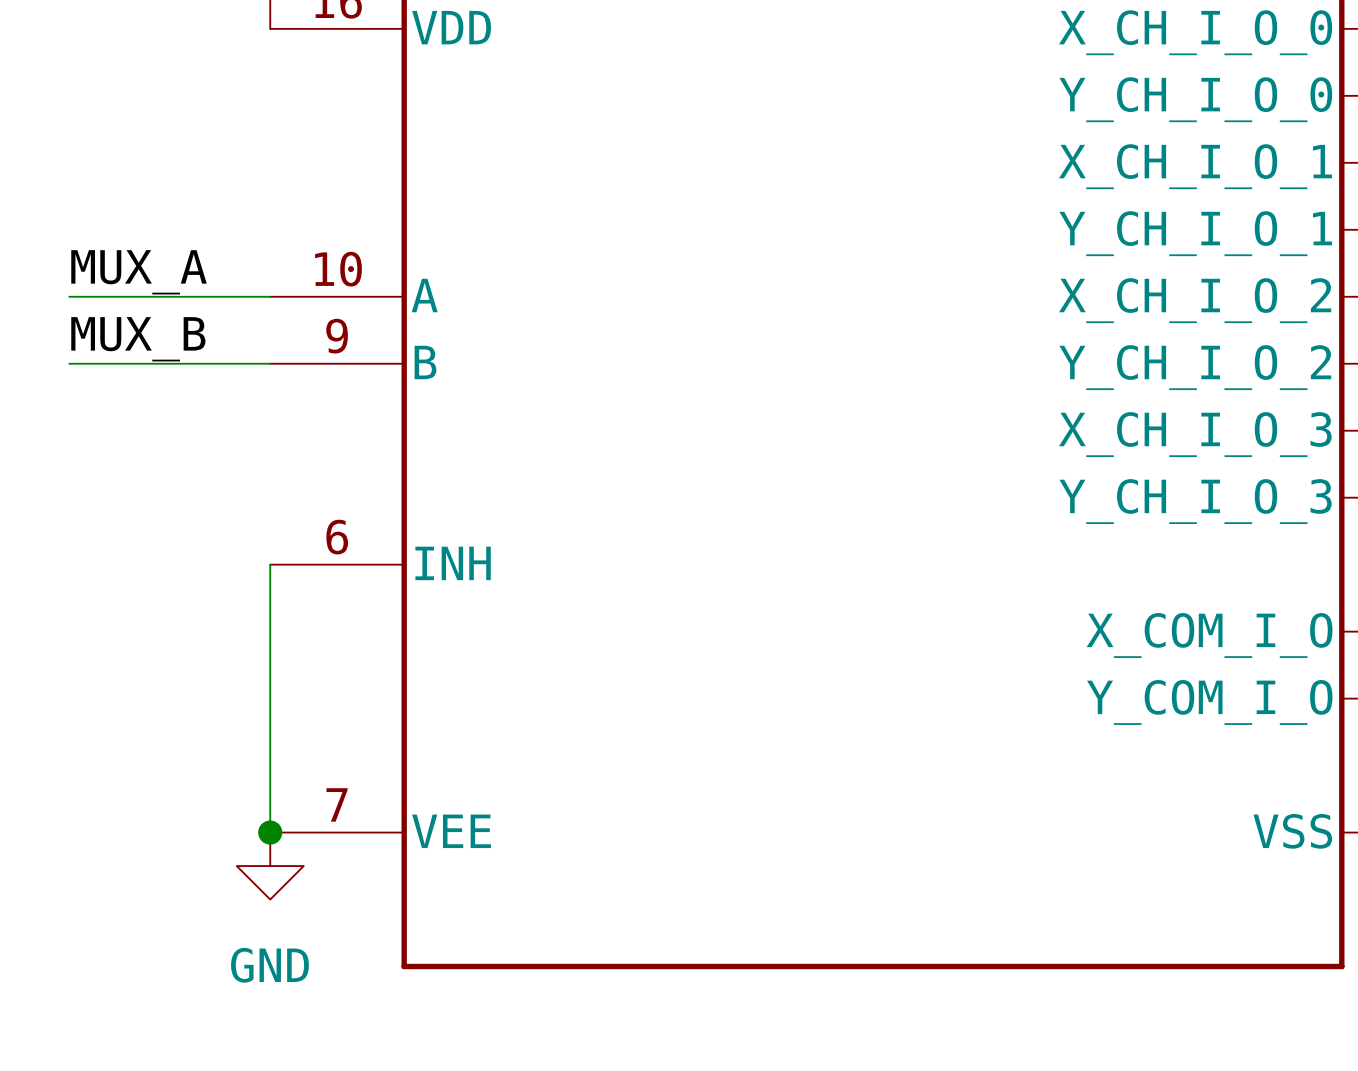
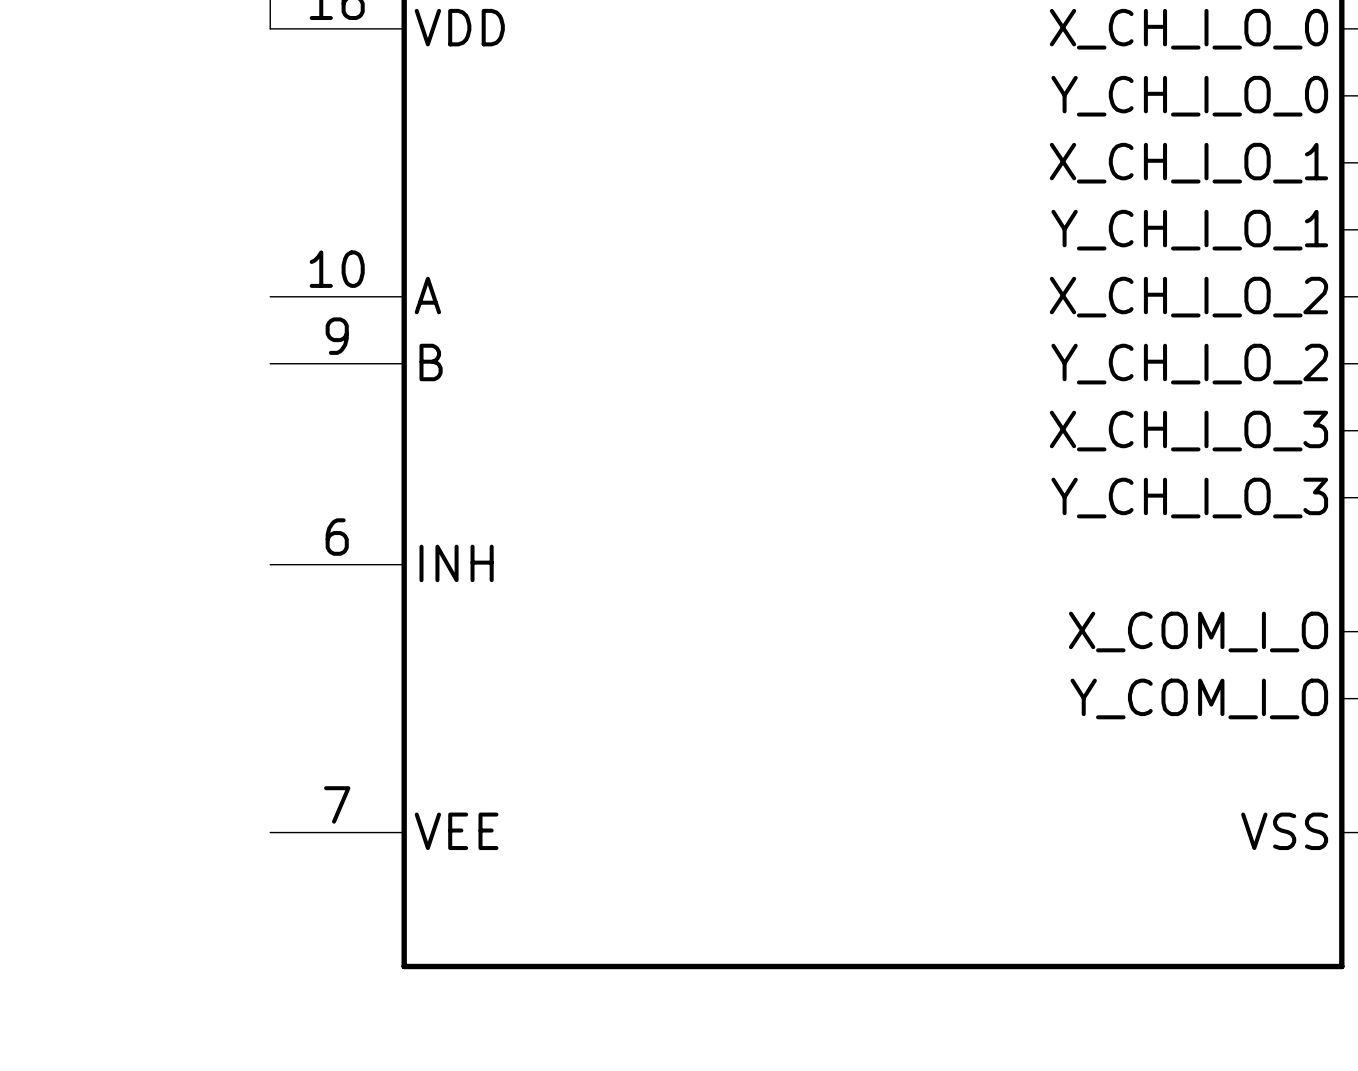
label: MUX_A (139, 272) -> none
wire: (69, 296) (270, 296) -> none
label: MUX_B (138, 339) -> none
wire: (69, 363) (270, 363) -> none
wire: (270, 564) (270, 832) -> none
junction: (270, 832) -> none
power symbol: GND (270, 866) -> none

